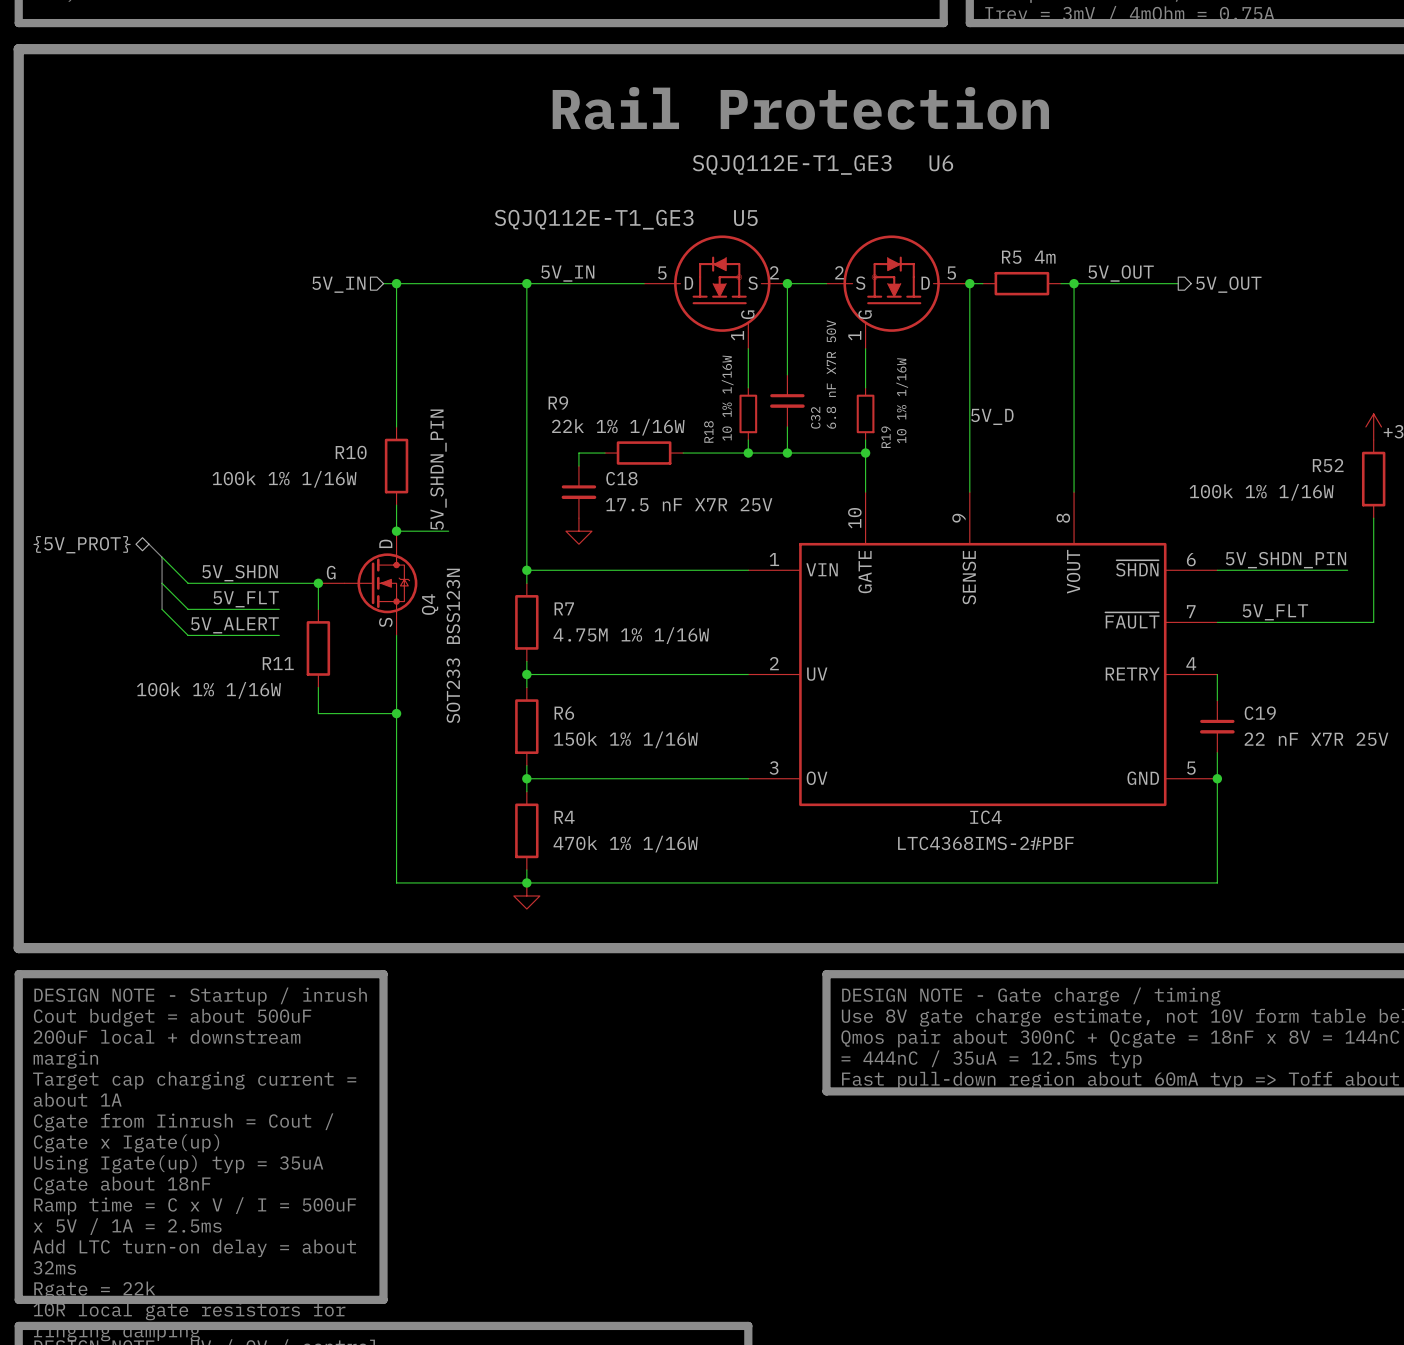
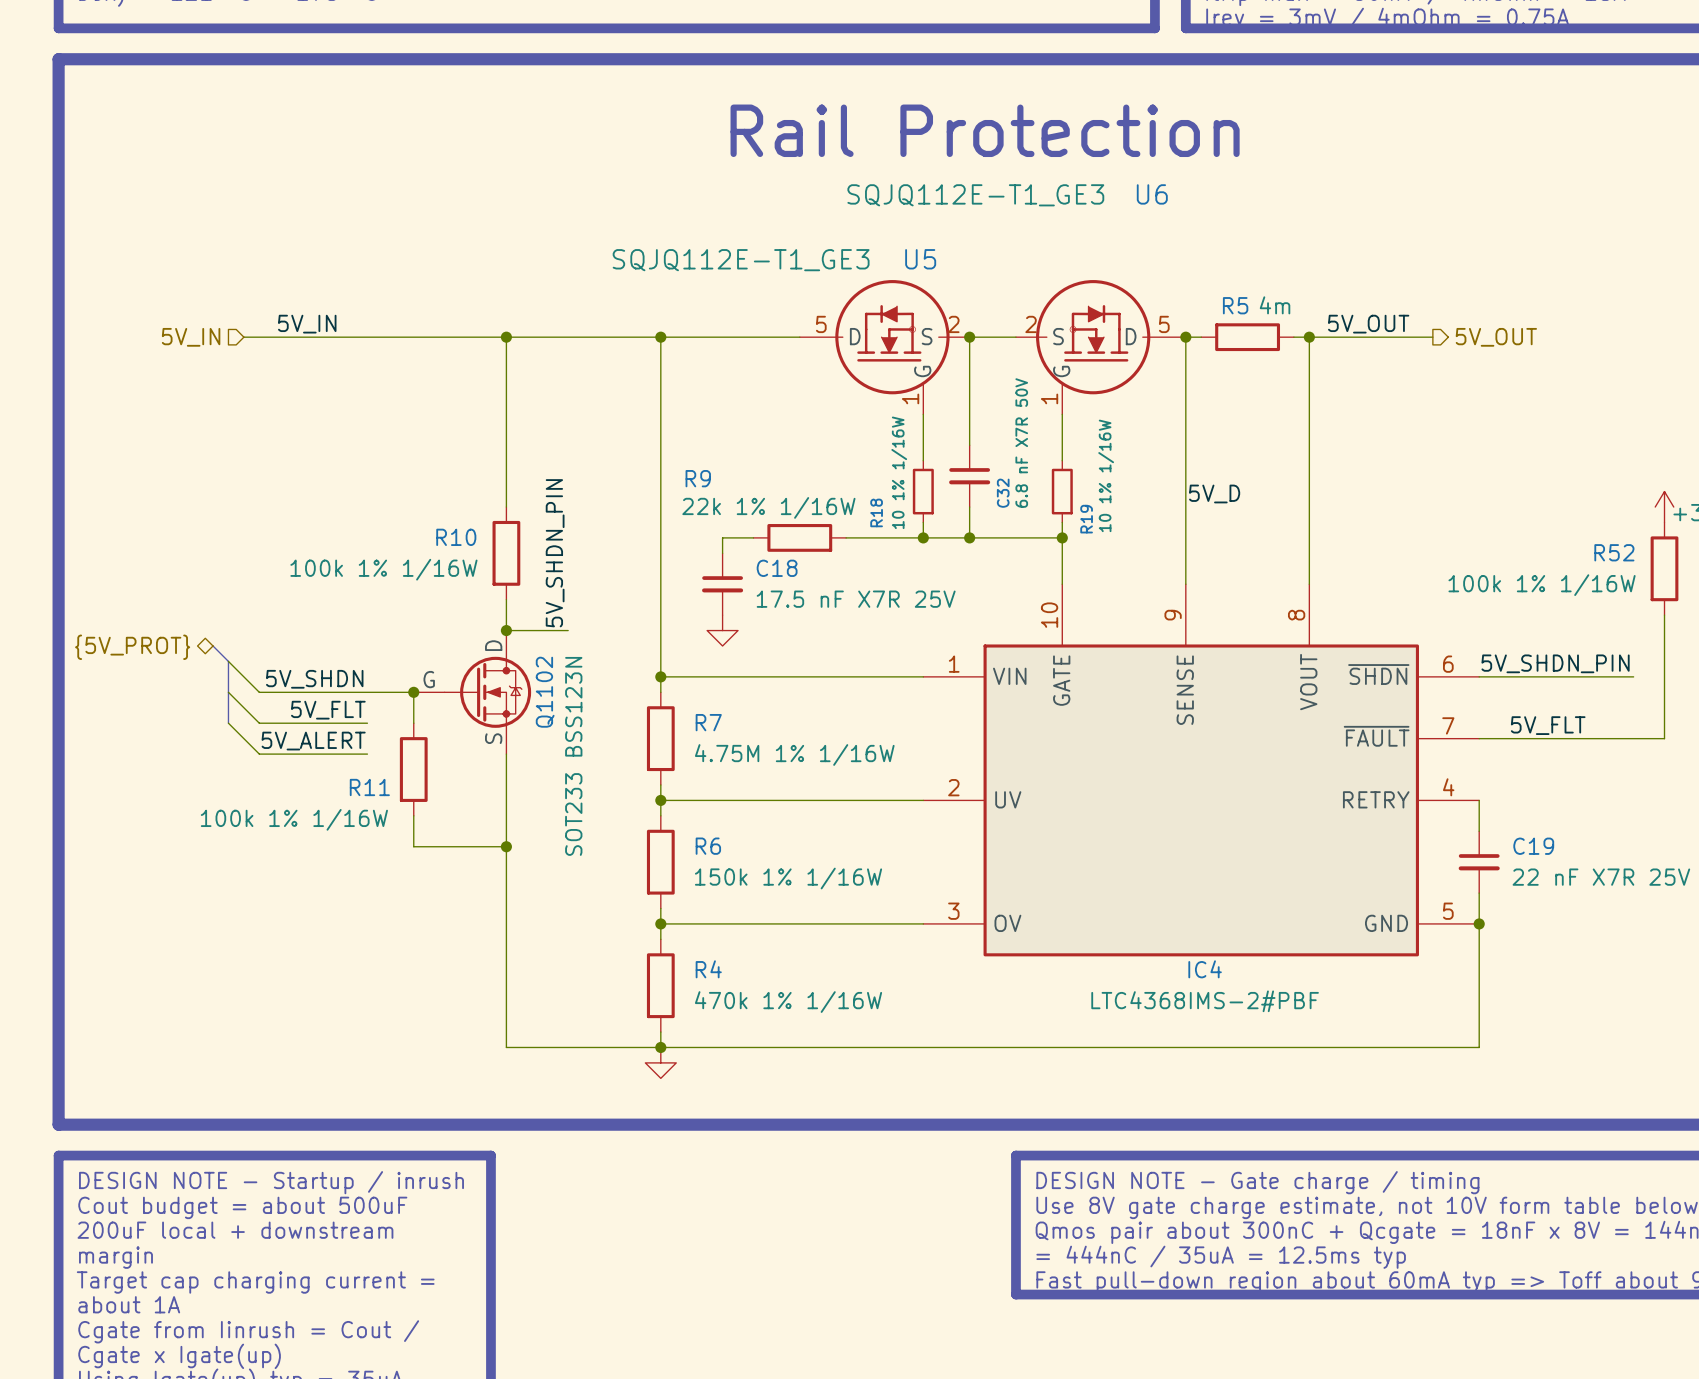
label: none -> 5V_IN (307, 324)
label: 5V_IN (567, 273) -> none
wire: none -> (243, 337) (490, 337)
hierarchical label position: 5V_IN (338, 284) -> 5V_IN (191, 337)
Q4 name: Q4 (430, 604) -> Q1102 (545, 692)

